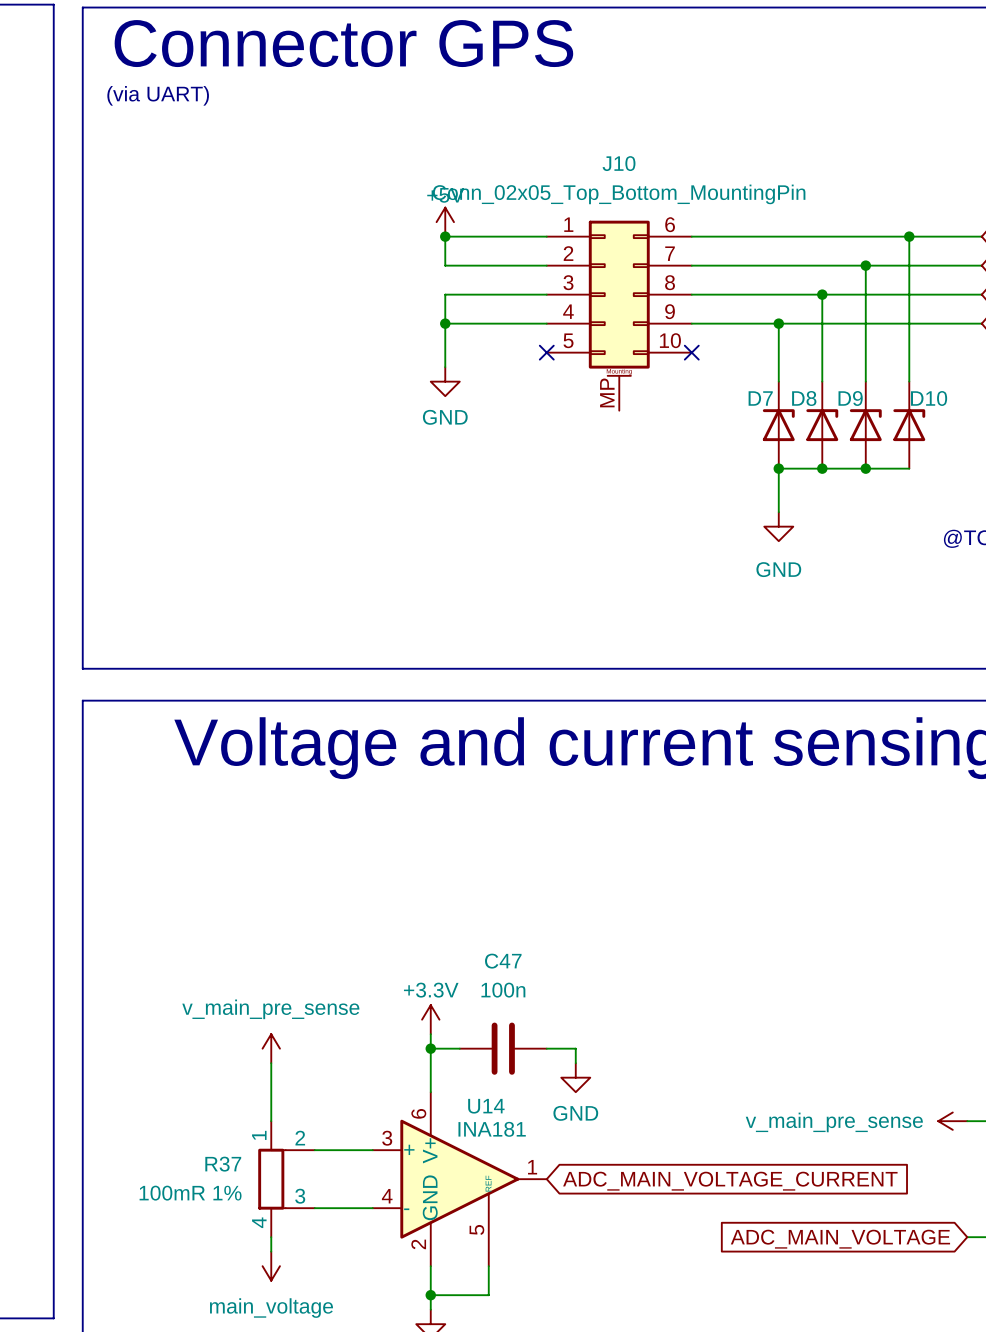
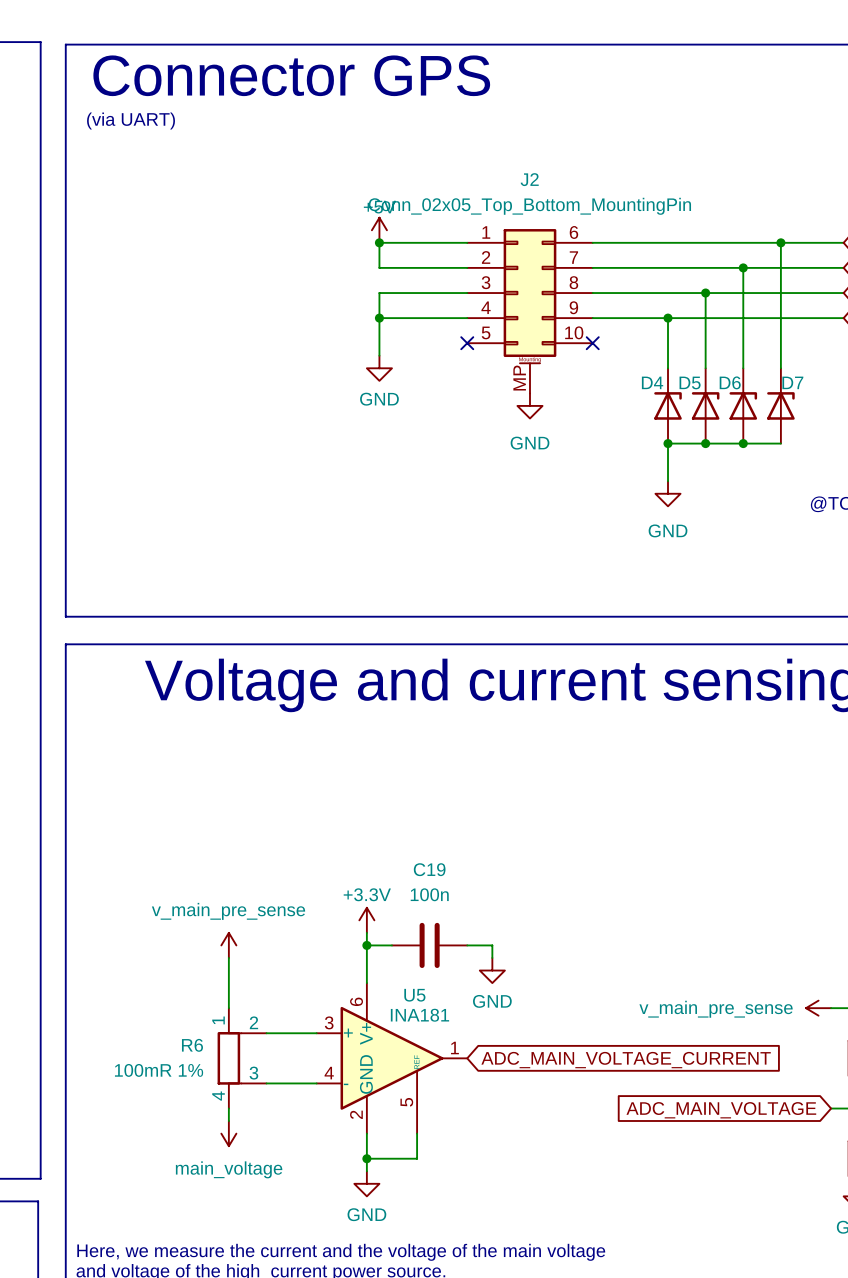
J10 name: J10 (619, 163) -> J2 (529, 179)
D7 name: D7 (760, 398) -> D4 (652, 382)
D8 name: D8 (804, 398) -> D5 (690, 382)
D9 name: D9 (850, 398) -> D6 (730, 382)
D10 name: D10 (929, 398) -> D7 (792, 382)
power symbol: none -> GND (529, 405)
C47 name: C47 (503, 961) -> C19 (429, 869)
U14 name: U14 (486, 1106) -> U5 (414, 995)
R37 name: R37 (223, 1164) -> R6 (192, 1045)

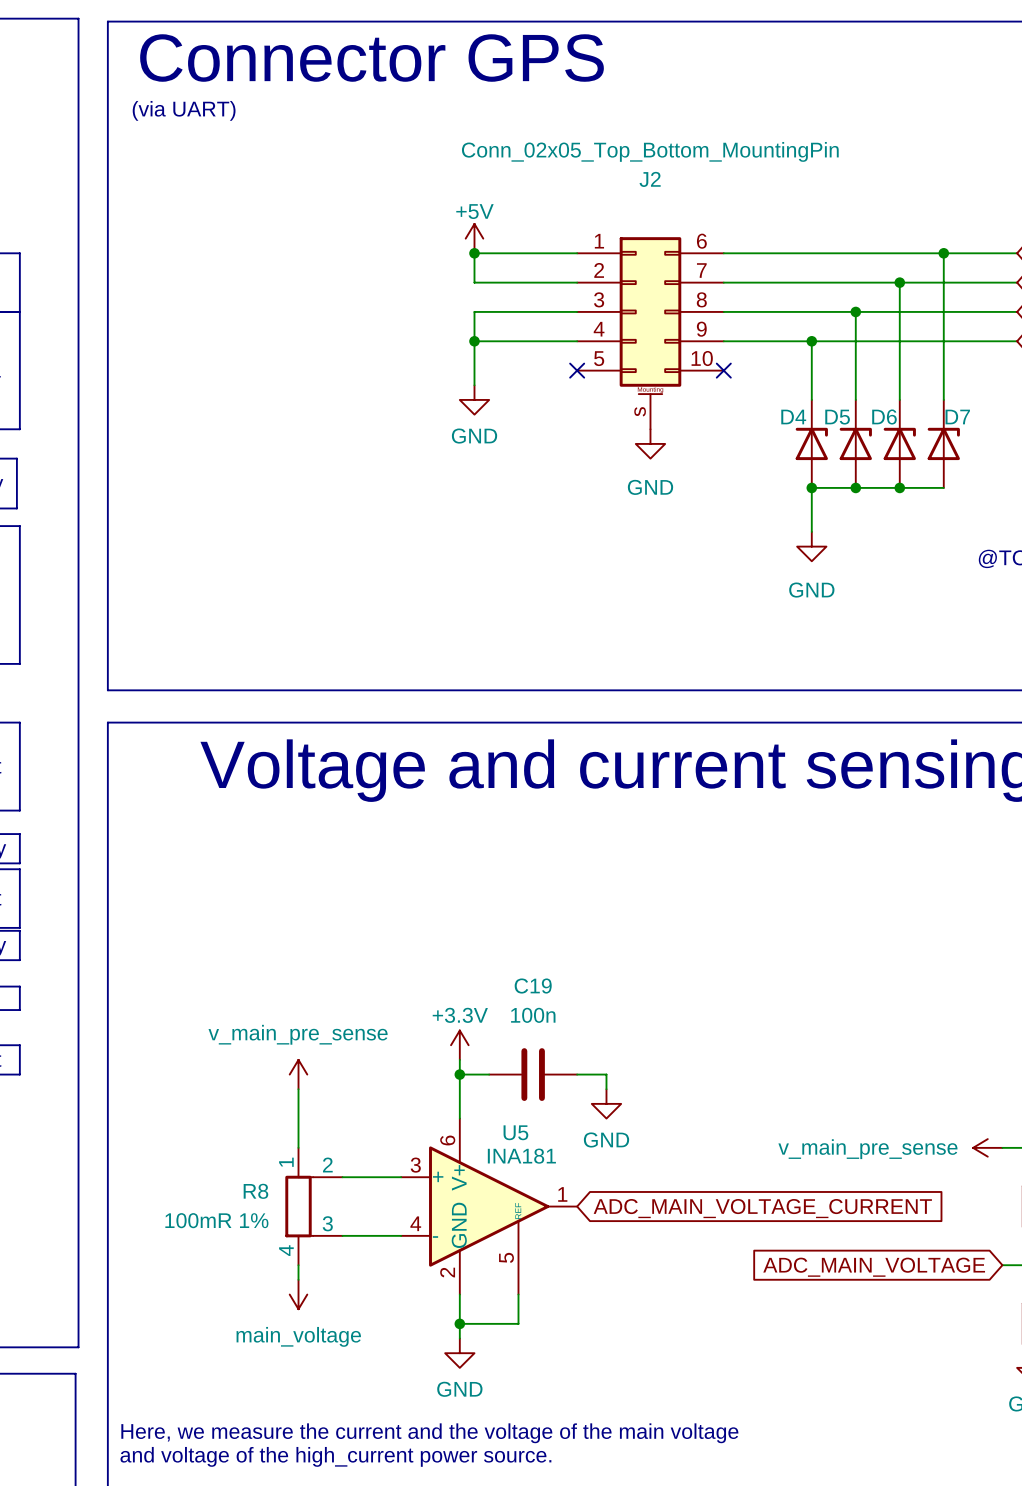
J2 value position: Conn_02x05_Top_Bottom_MountingPin (529, 206) -> Conn_02x05_Top_Bottom_MountingPin (650, 151)
J2 pin number: MP (519, 378) -> s (640, 411)
R6 name: R6 (192, 1045) -> R8 (255, 1191)

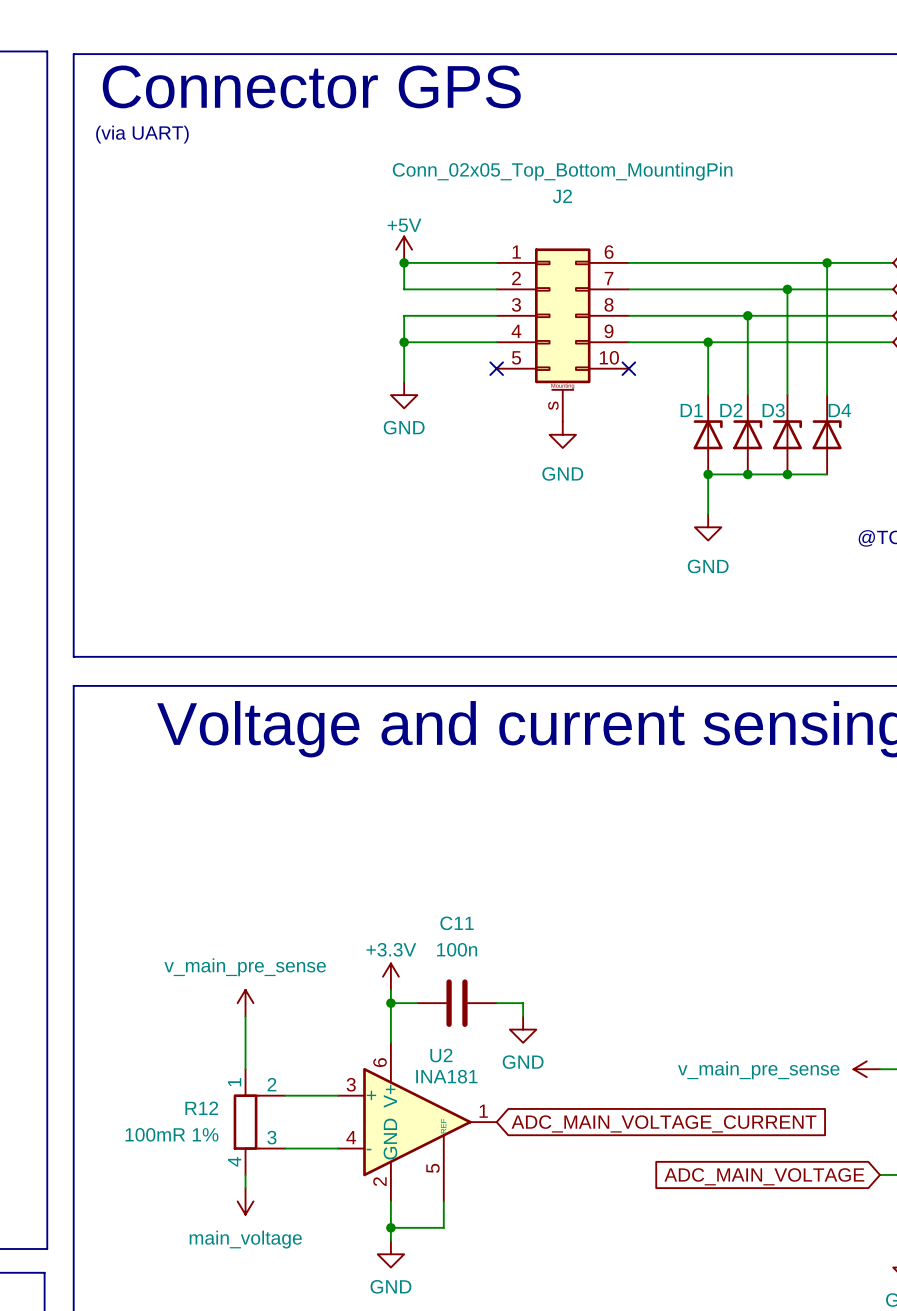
D4 name: D4 (793, 417) -> D1 (691, 410)
D5 name: D5 (837, 417) -> D2 (731, 410)
D6 name: D6 (884, 417) -> D3 (773, 410)
D7 name: D7 (957, 417) -> D4 (839, 410)
C19 name: C19 (533, 986) -> C11 (457, 923)
U5 name: U5 (515, 1132) -> U2 (441, 1055)
R8 name: R8 (255, 1191) -> R12 (201, 1108)

